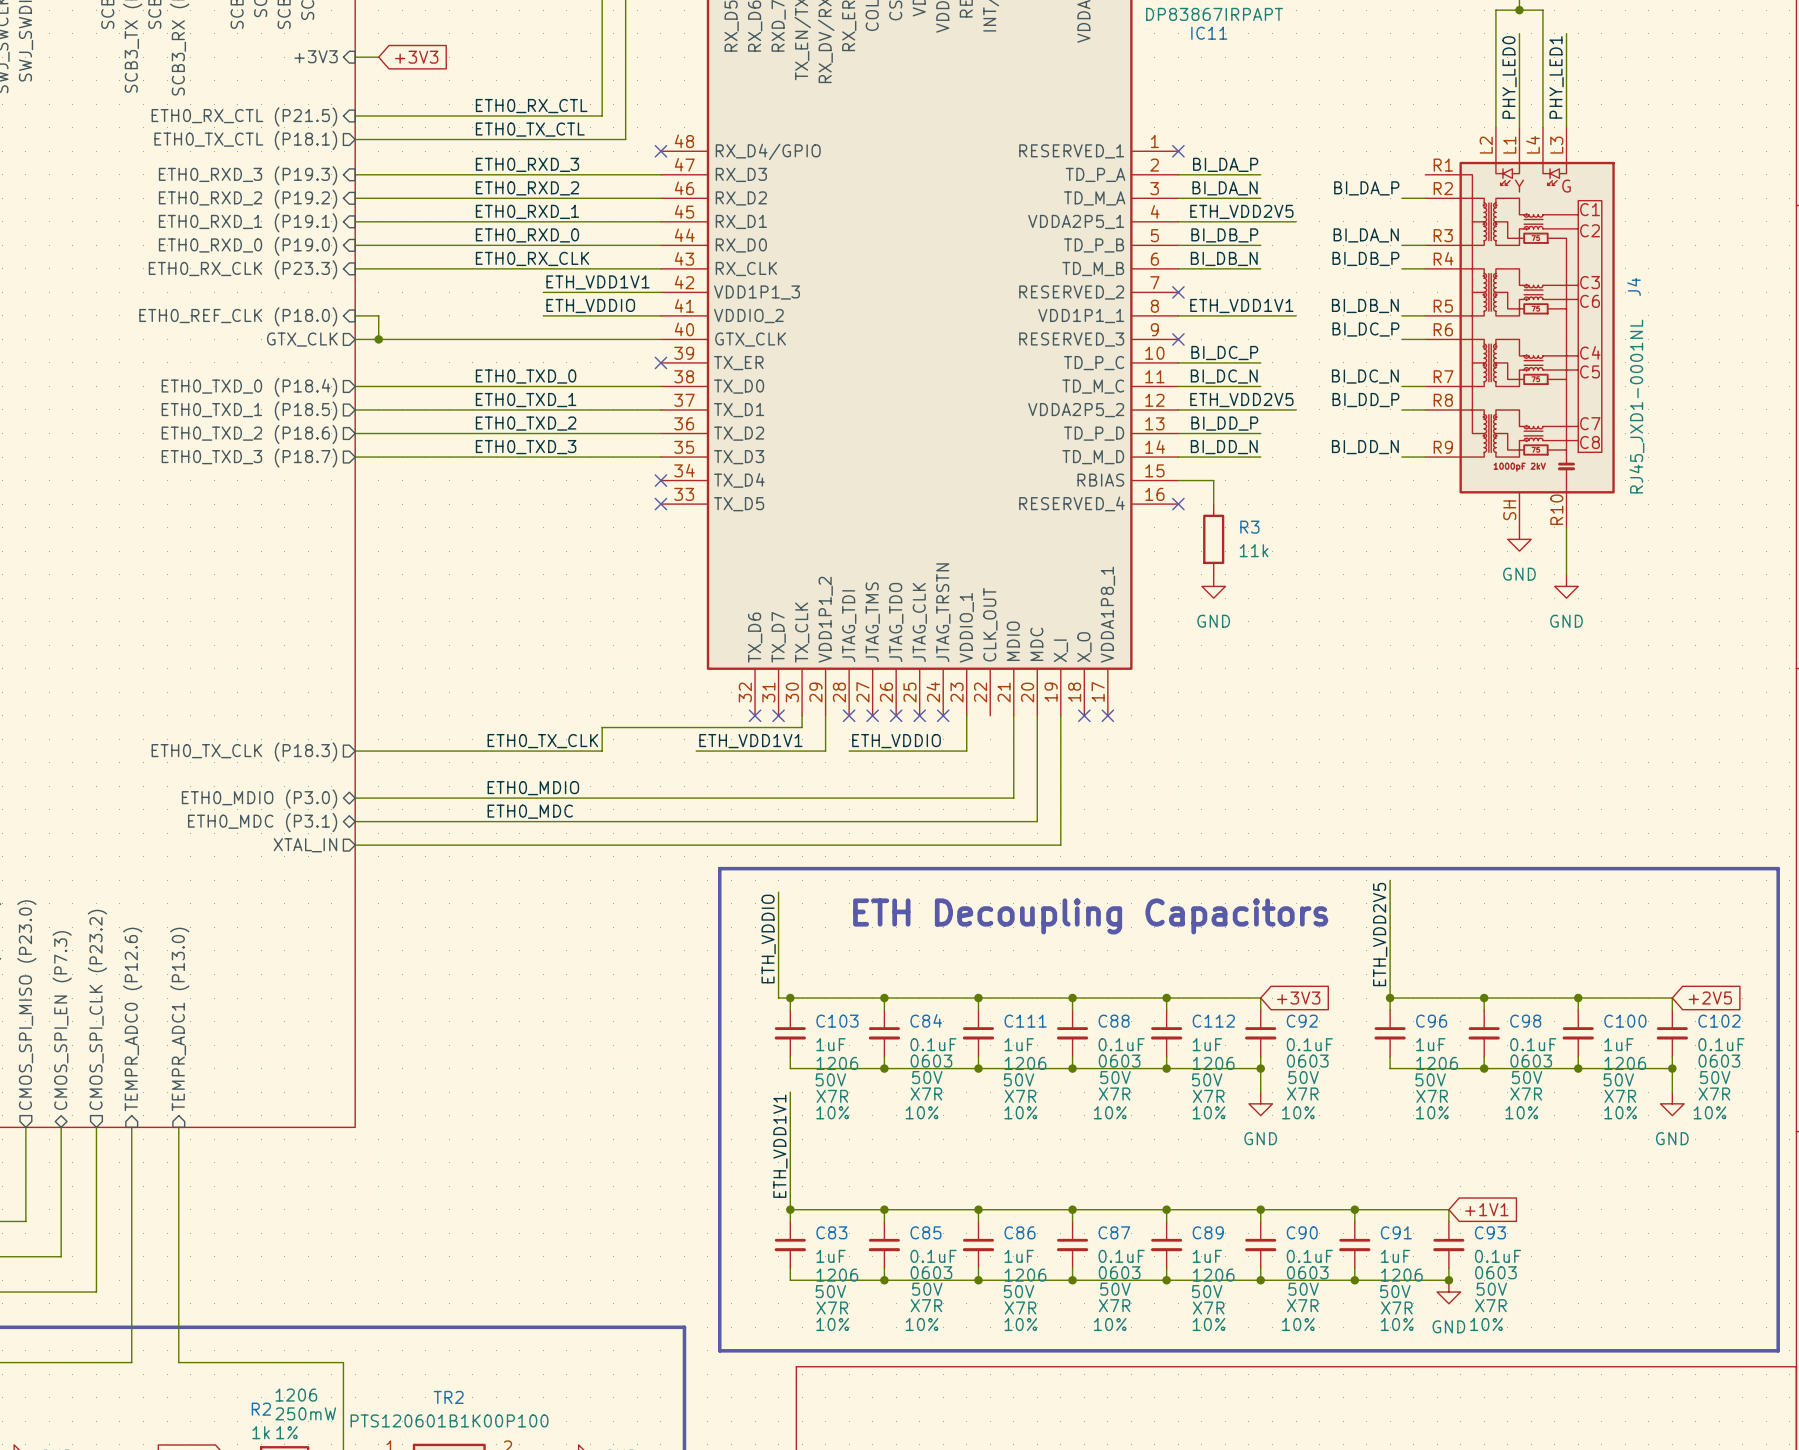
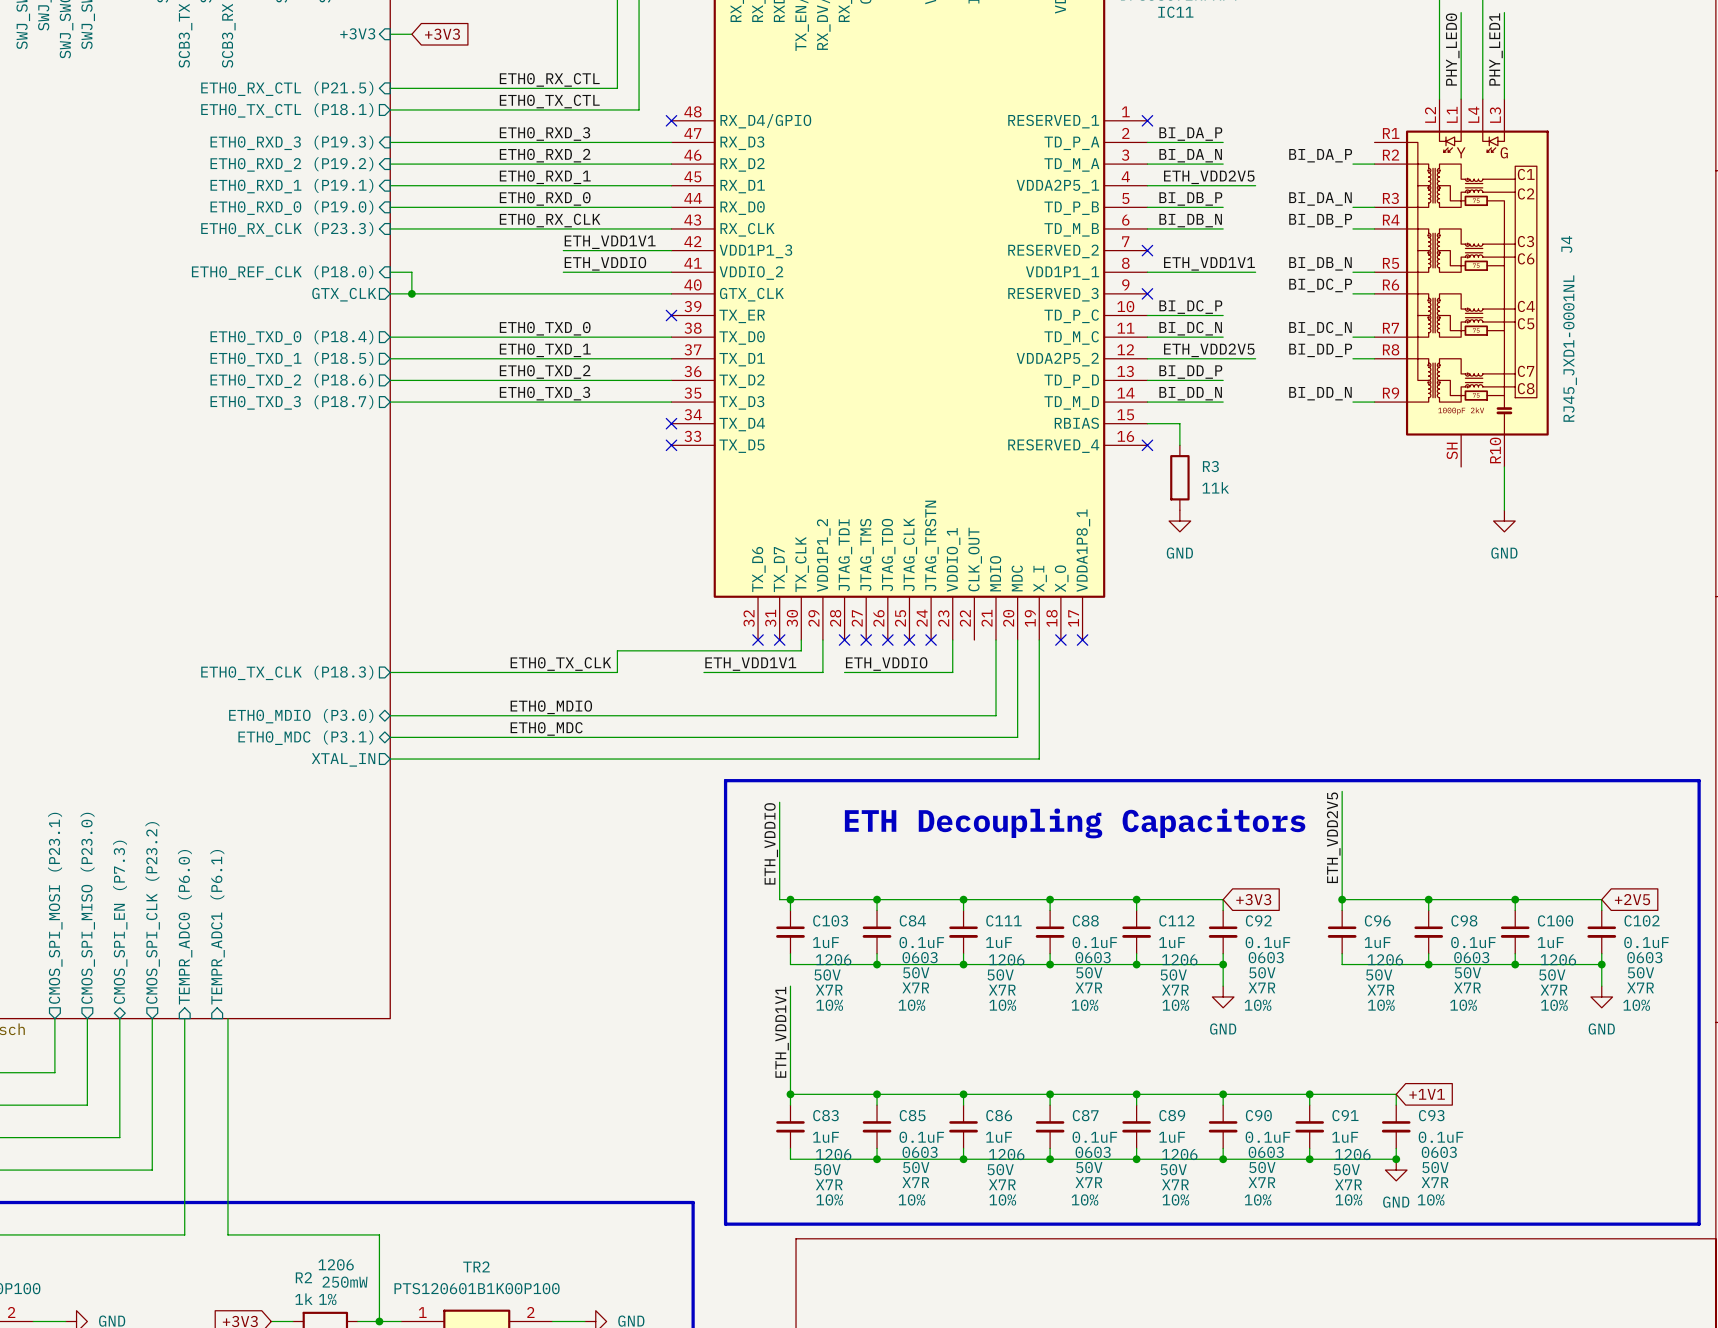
power symbol: GND (1519, 539) -> none
sheet pin: TEMPR_ADC0 (P12.6) (132, 1019) -> TEMPR_ADC0 (P6.0) (185, 927)
sheet pin: TEMPR_ADC1 (P13.0) (179, 1019) -> TEMPR_ADC1 (P6.1) (217, 927)

